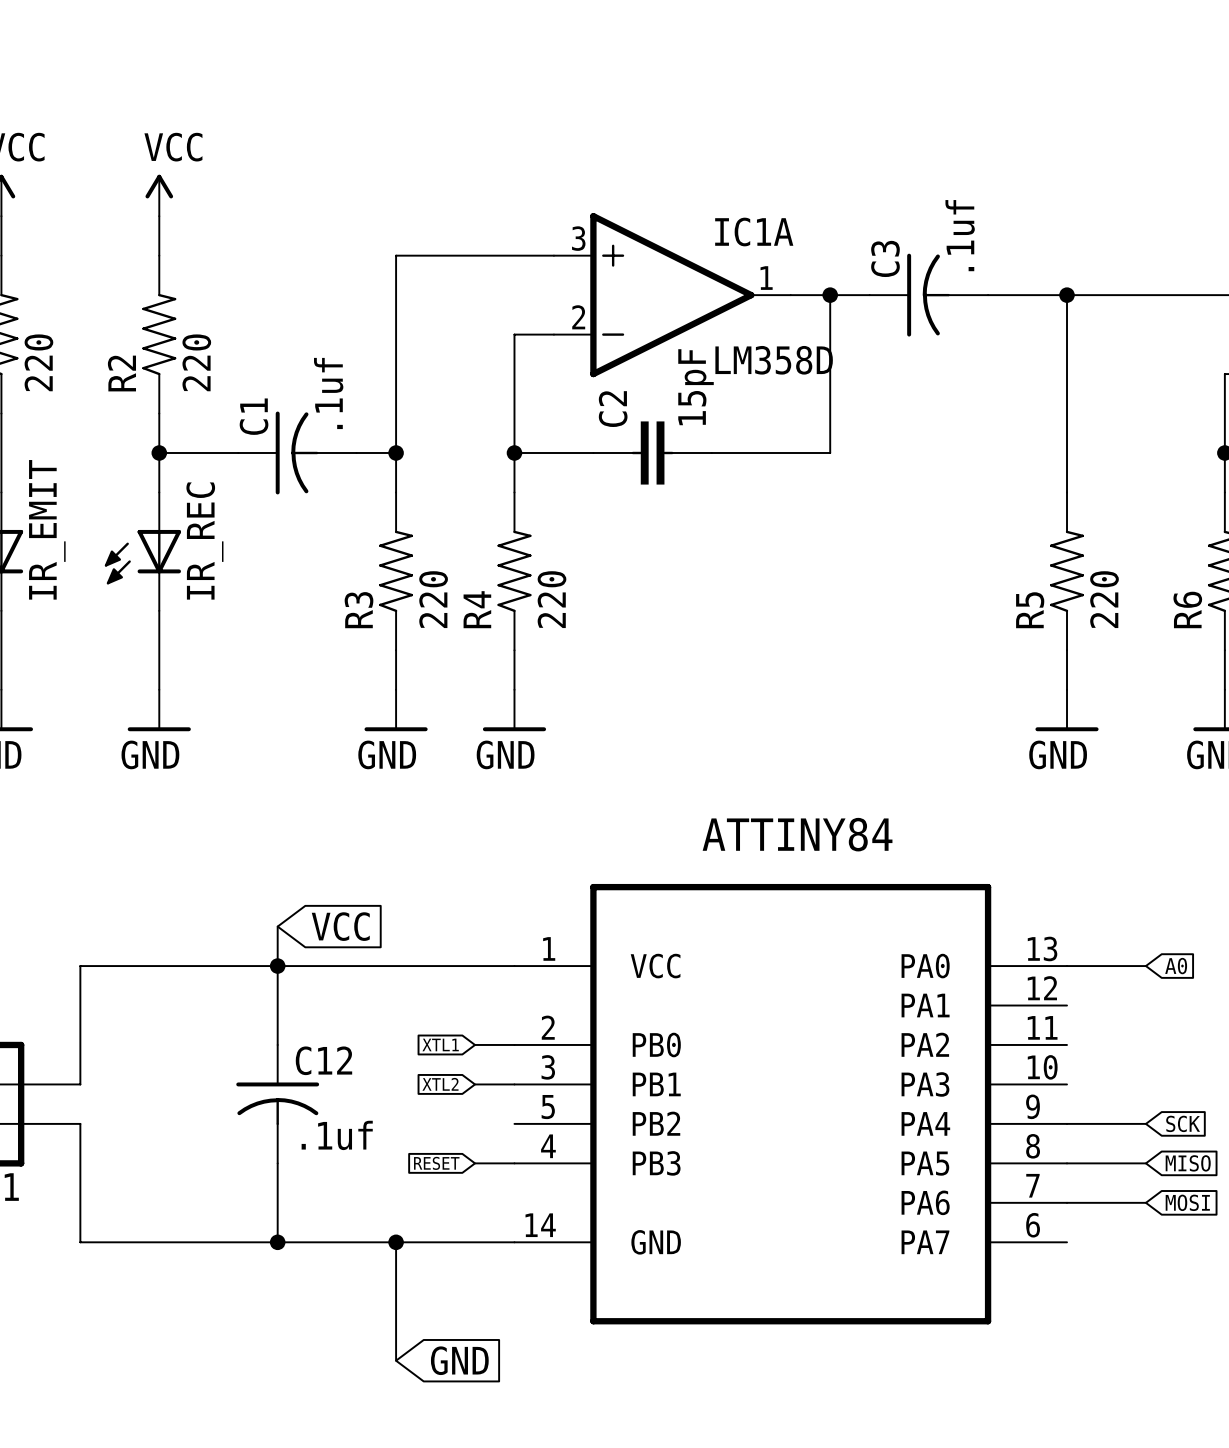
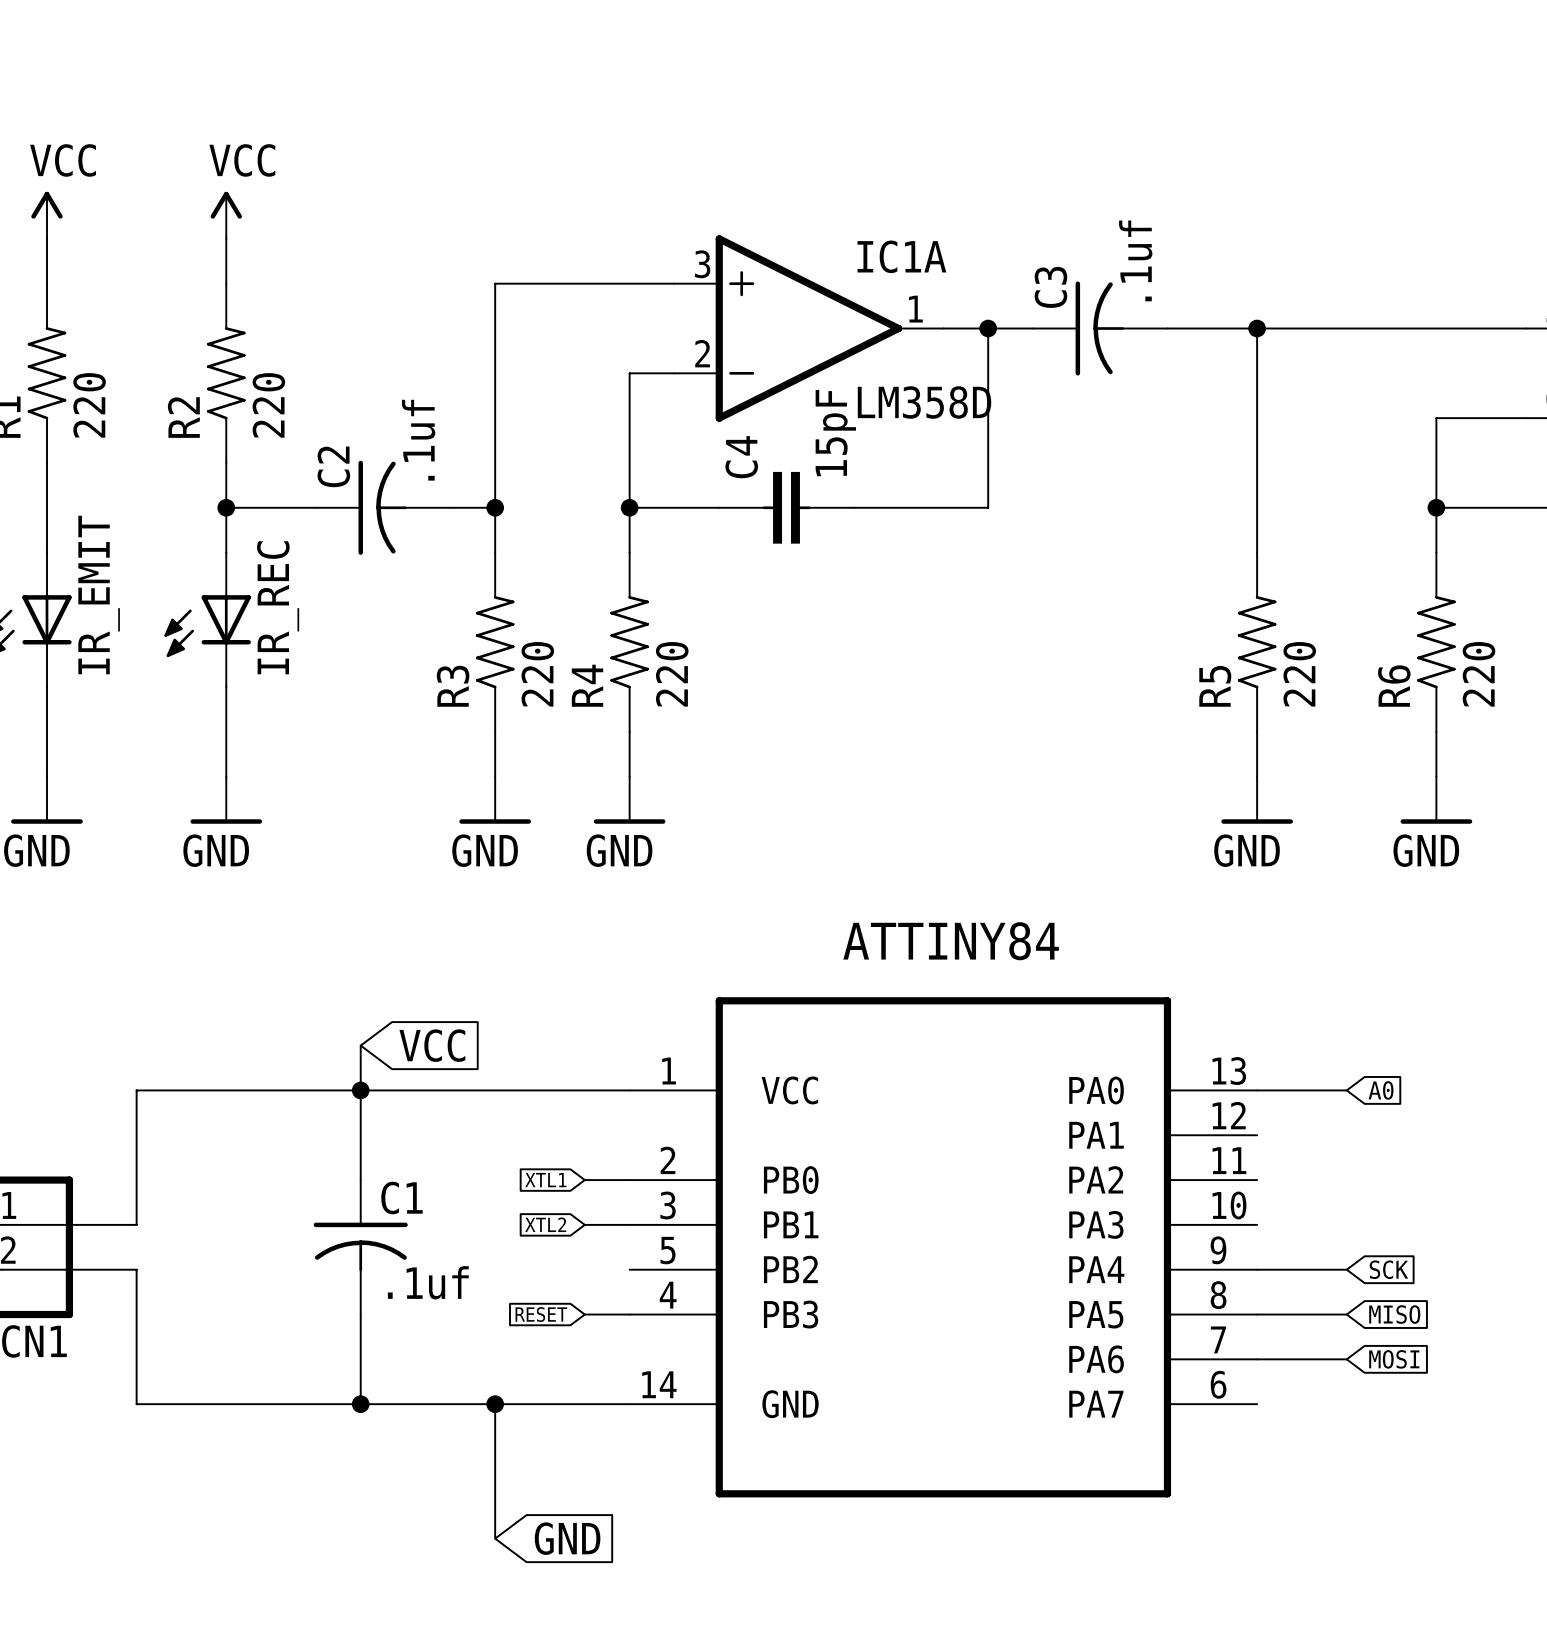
C2 name: C2 (613, 409) -> C4 (741, 457)
C1 name: C1 (254, 416) -> C2 (333, 466)
C12 name: C12 (323, 1060) -> C1 (401, 1198)

